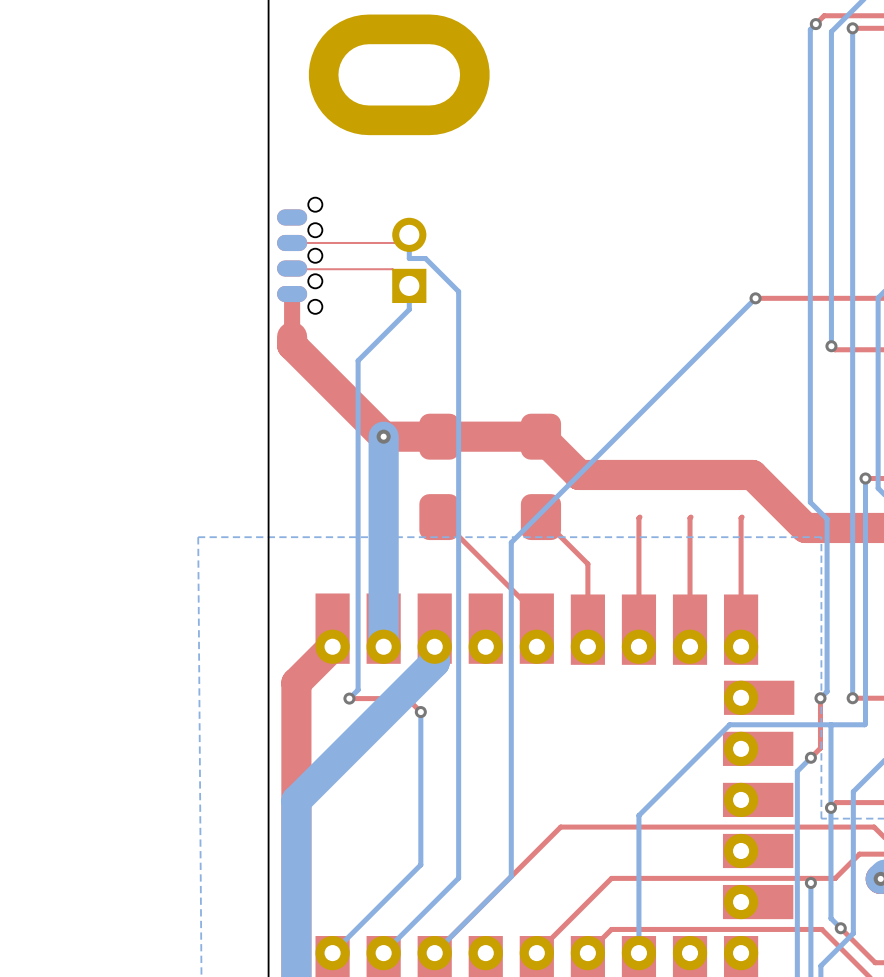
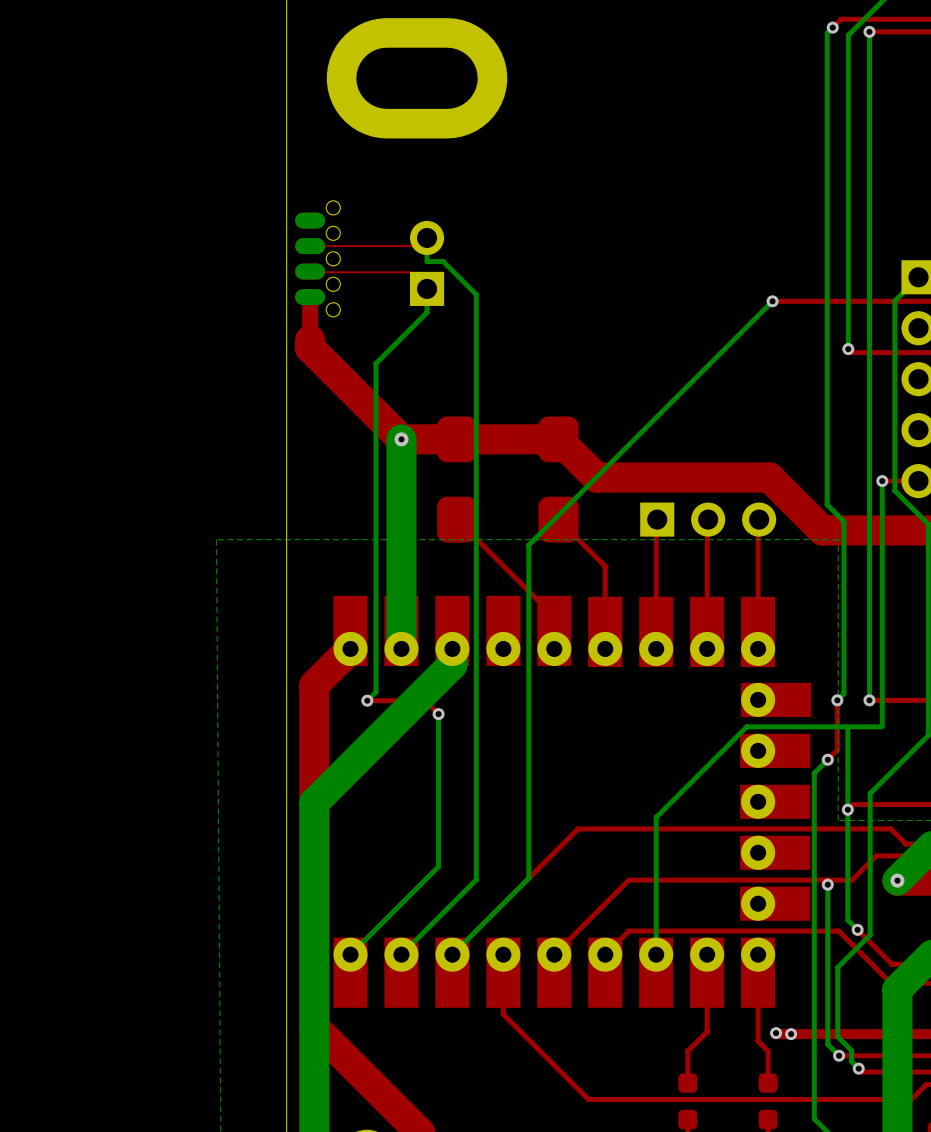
part: none -> (708, 519)

